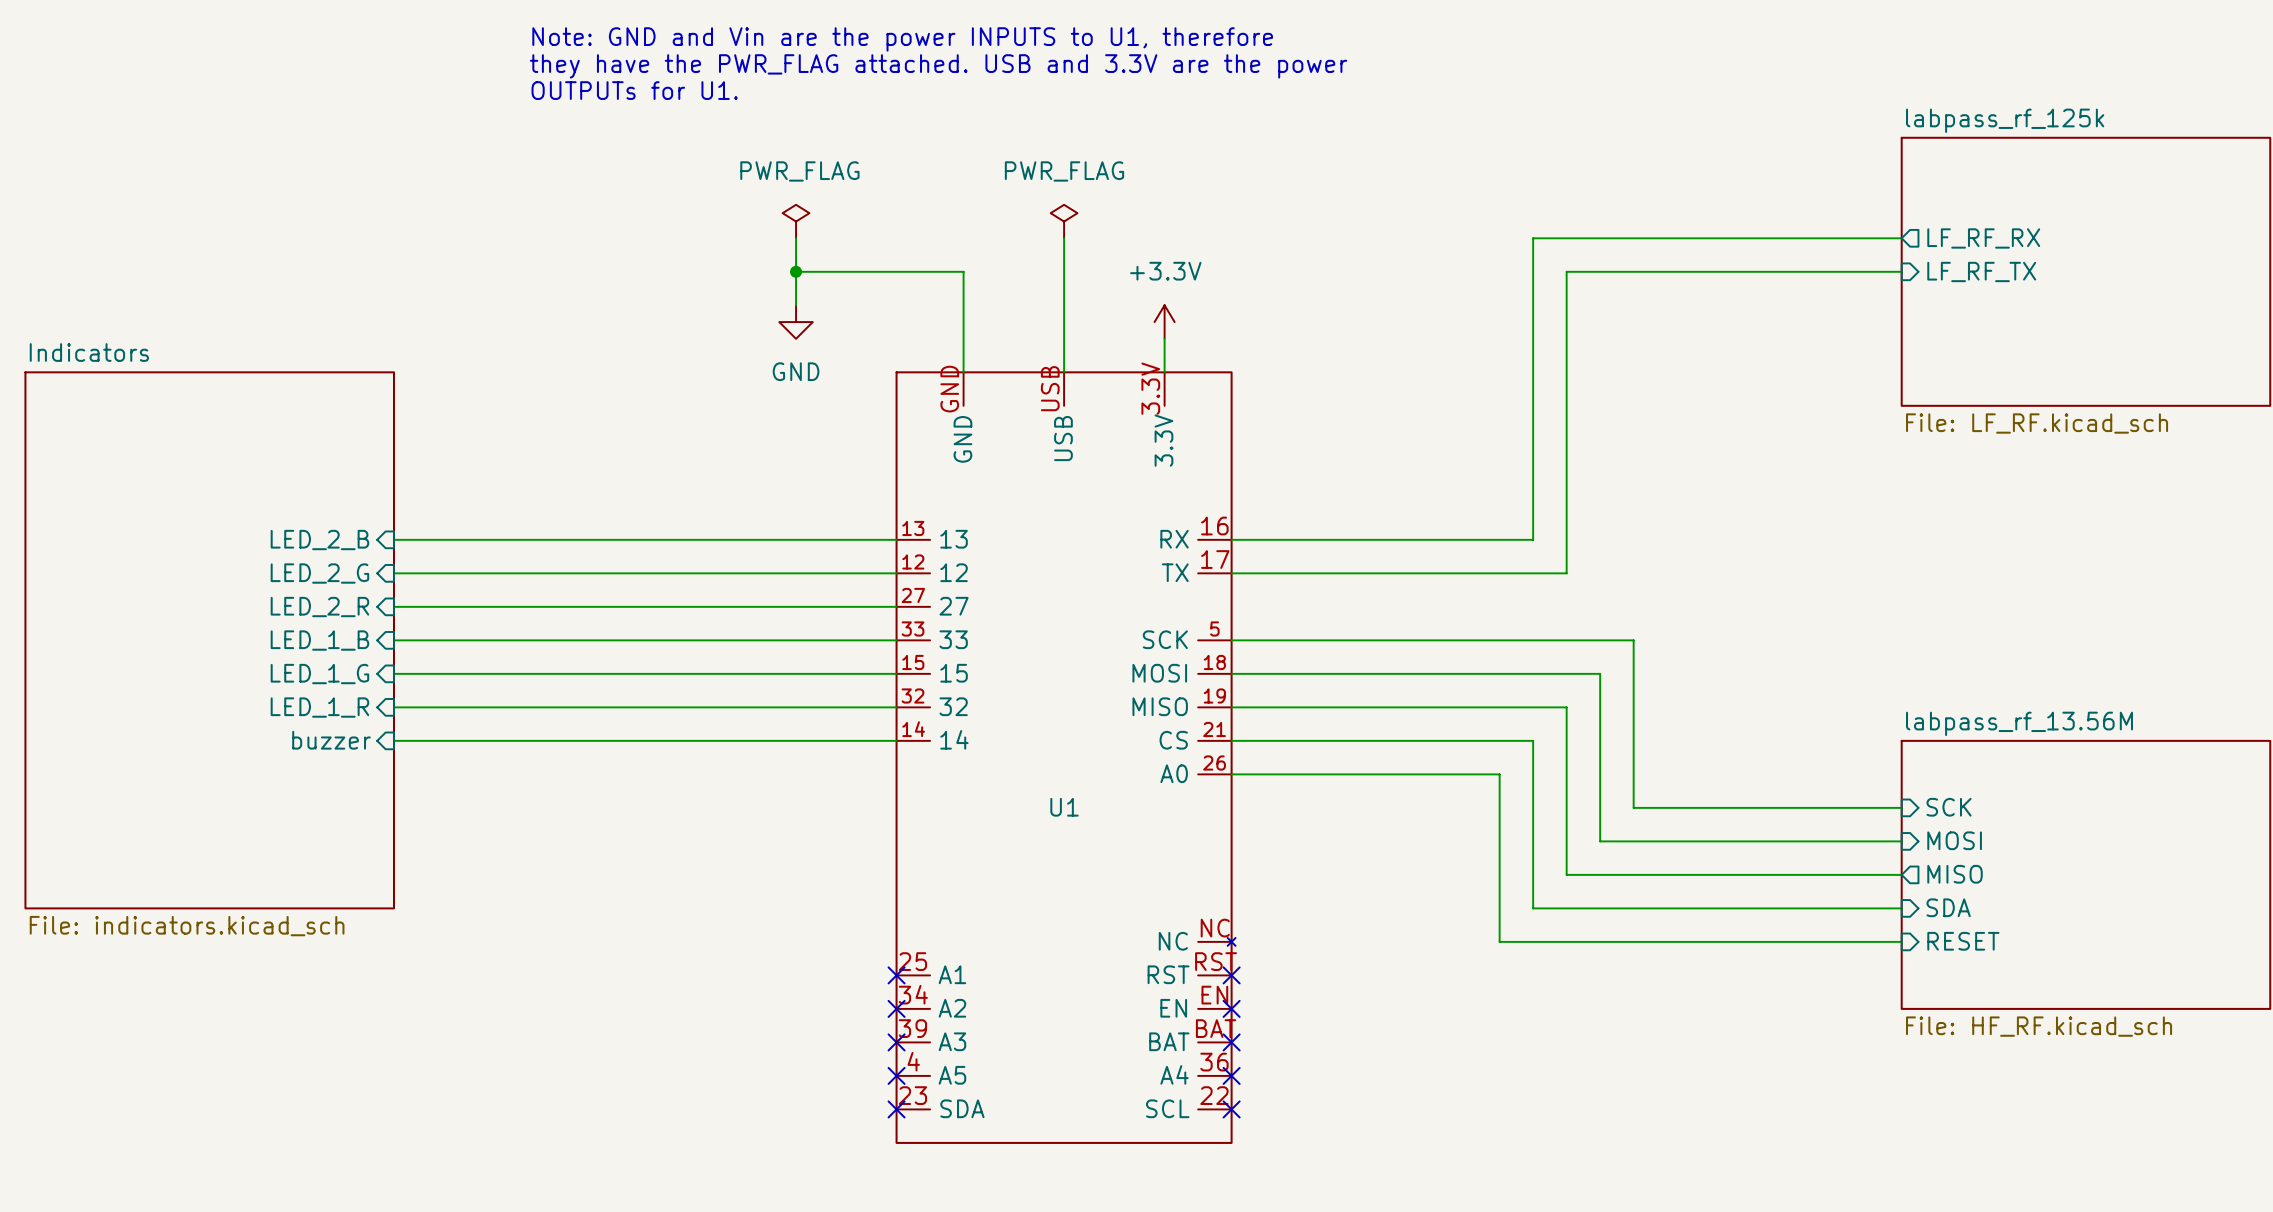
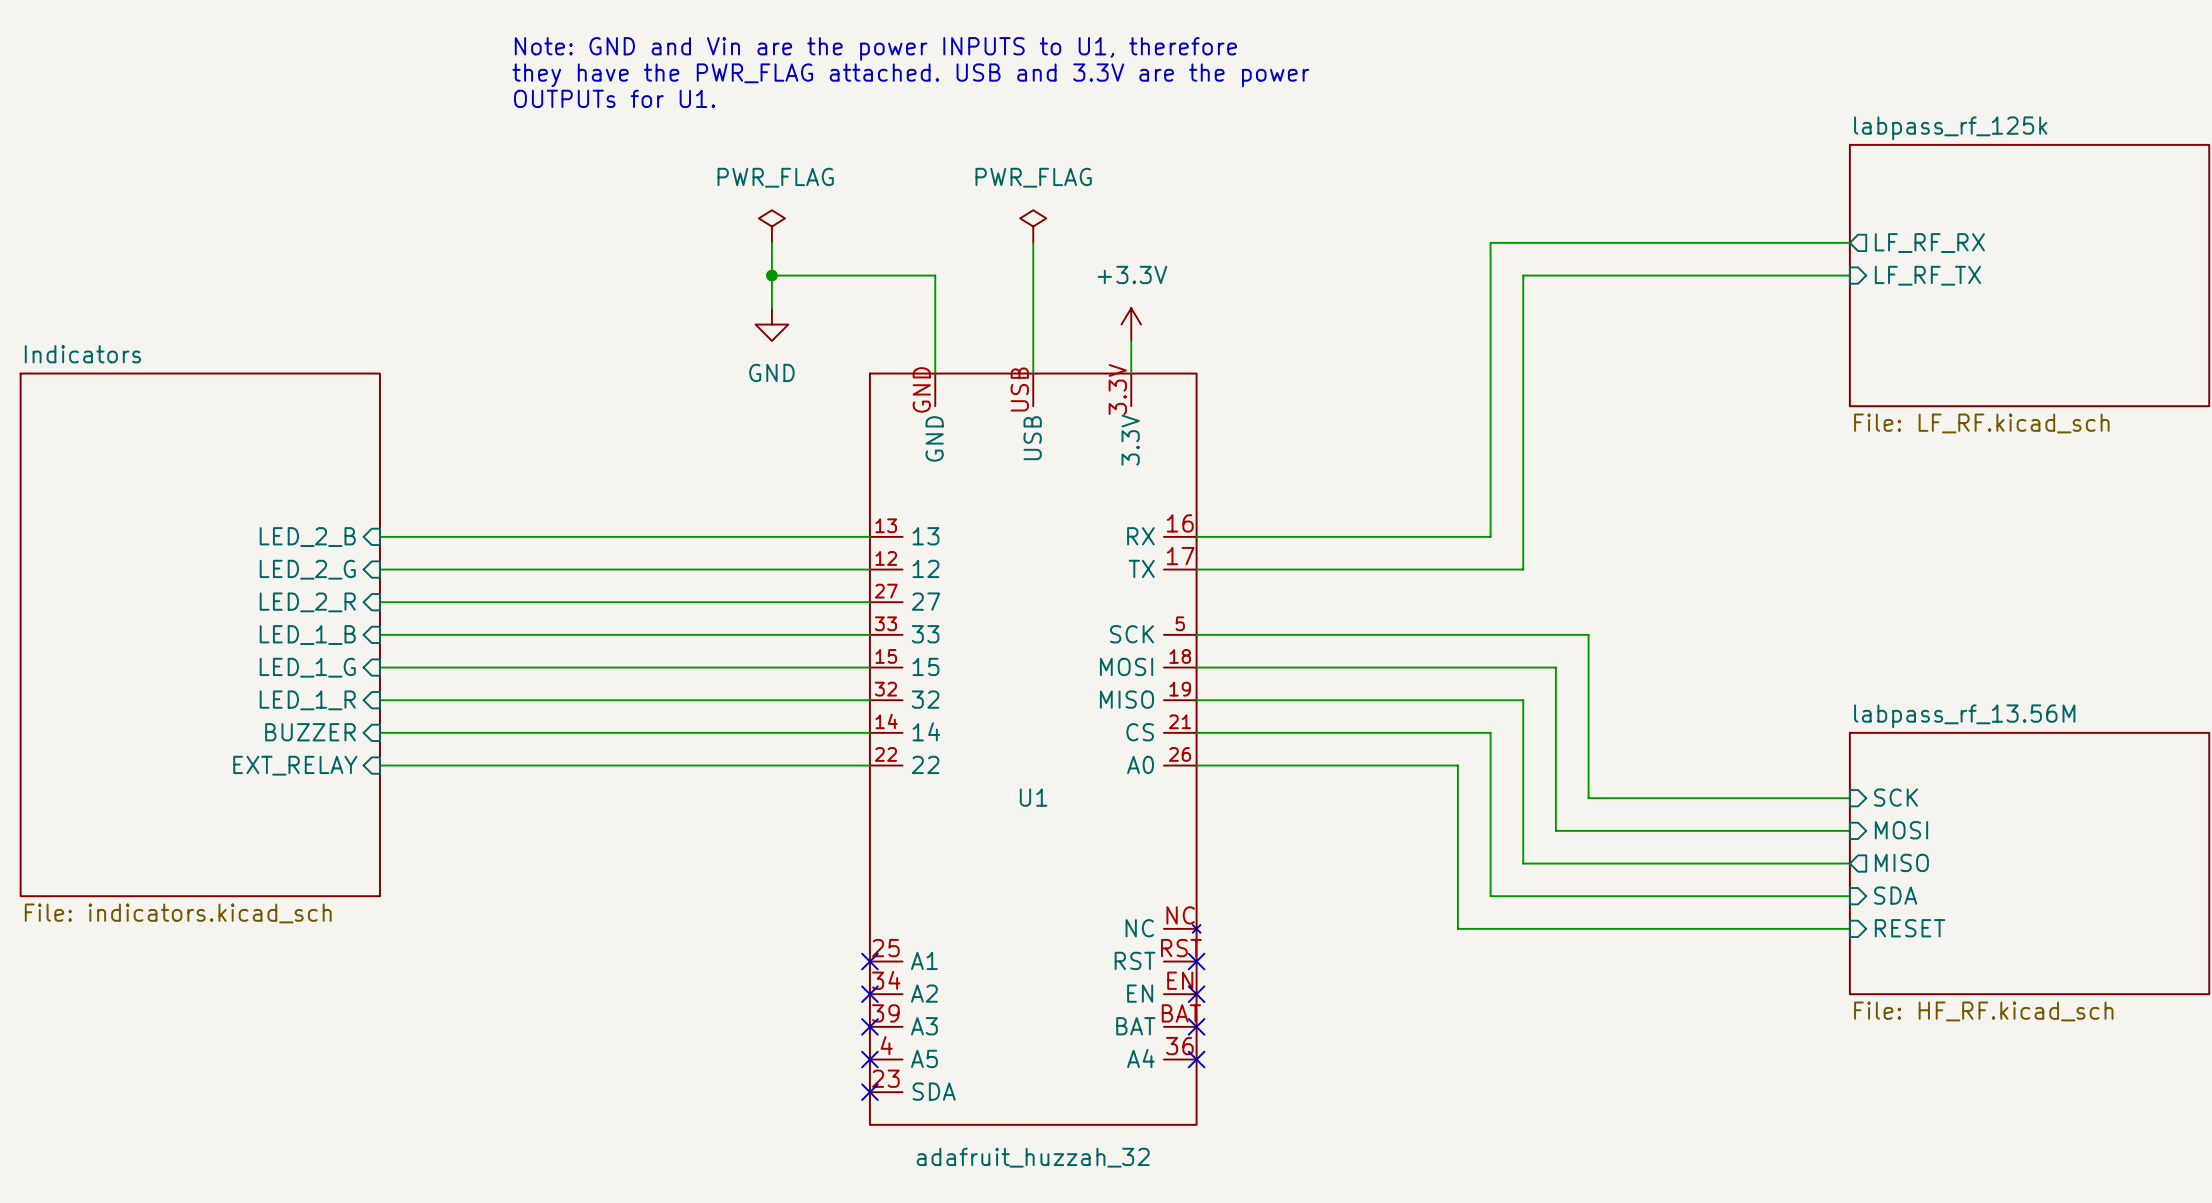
U1 symbol: [895, 371, 1236, 1144] -> [868, 372, 1201, 1126]
sheet pin: buzzer (331, 740) -> BUZZER (310, 732)
sheet pin: none -> EXT_RELAY (295, 765)
wire: none -> (379, 765) (869, 765)
no-connect mark: (1231, 1109) -> none
U1 value: none -> adafruit_huzzah_32 (1033, 1157)

